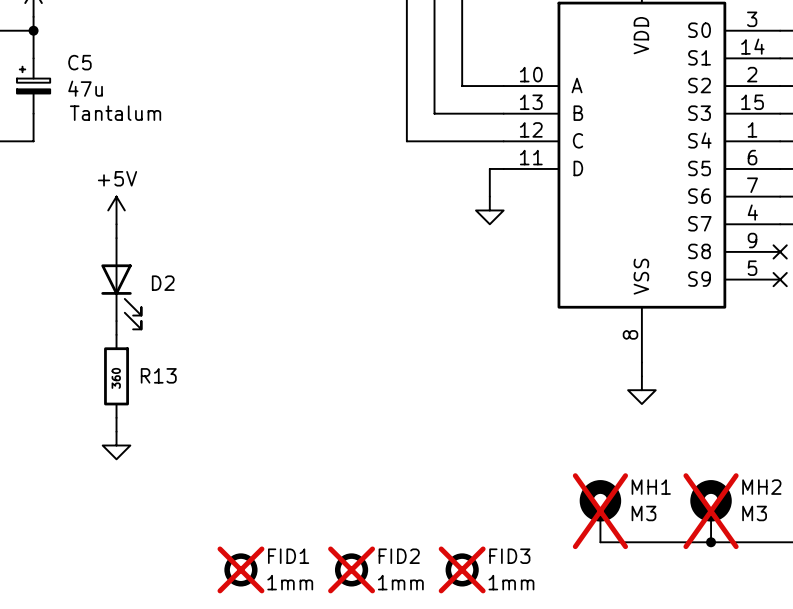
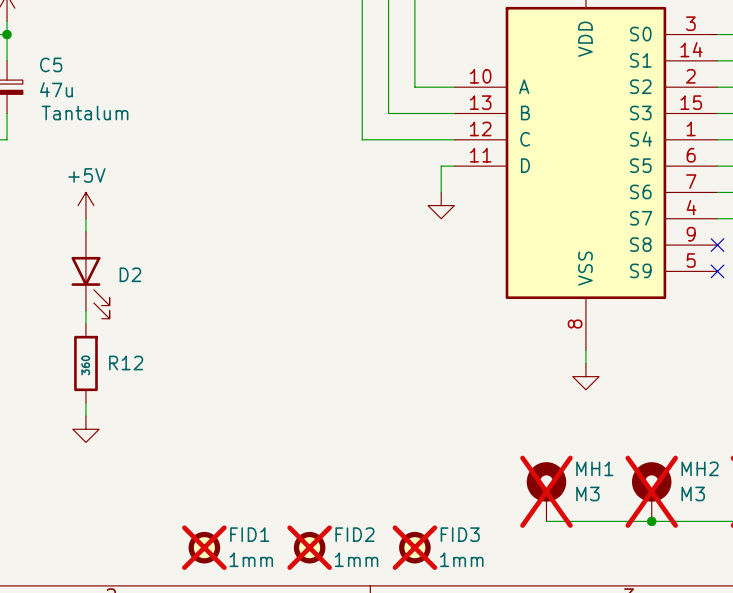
R13 name: R13 (158, 375) -> R12 (126, 362)

